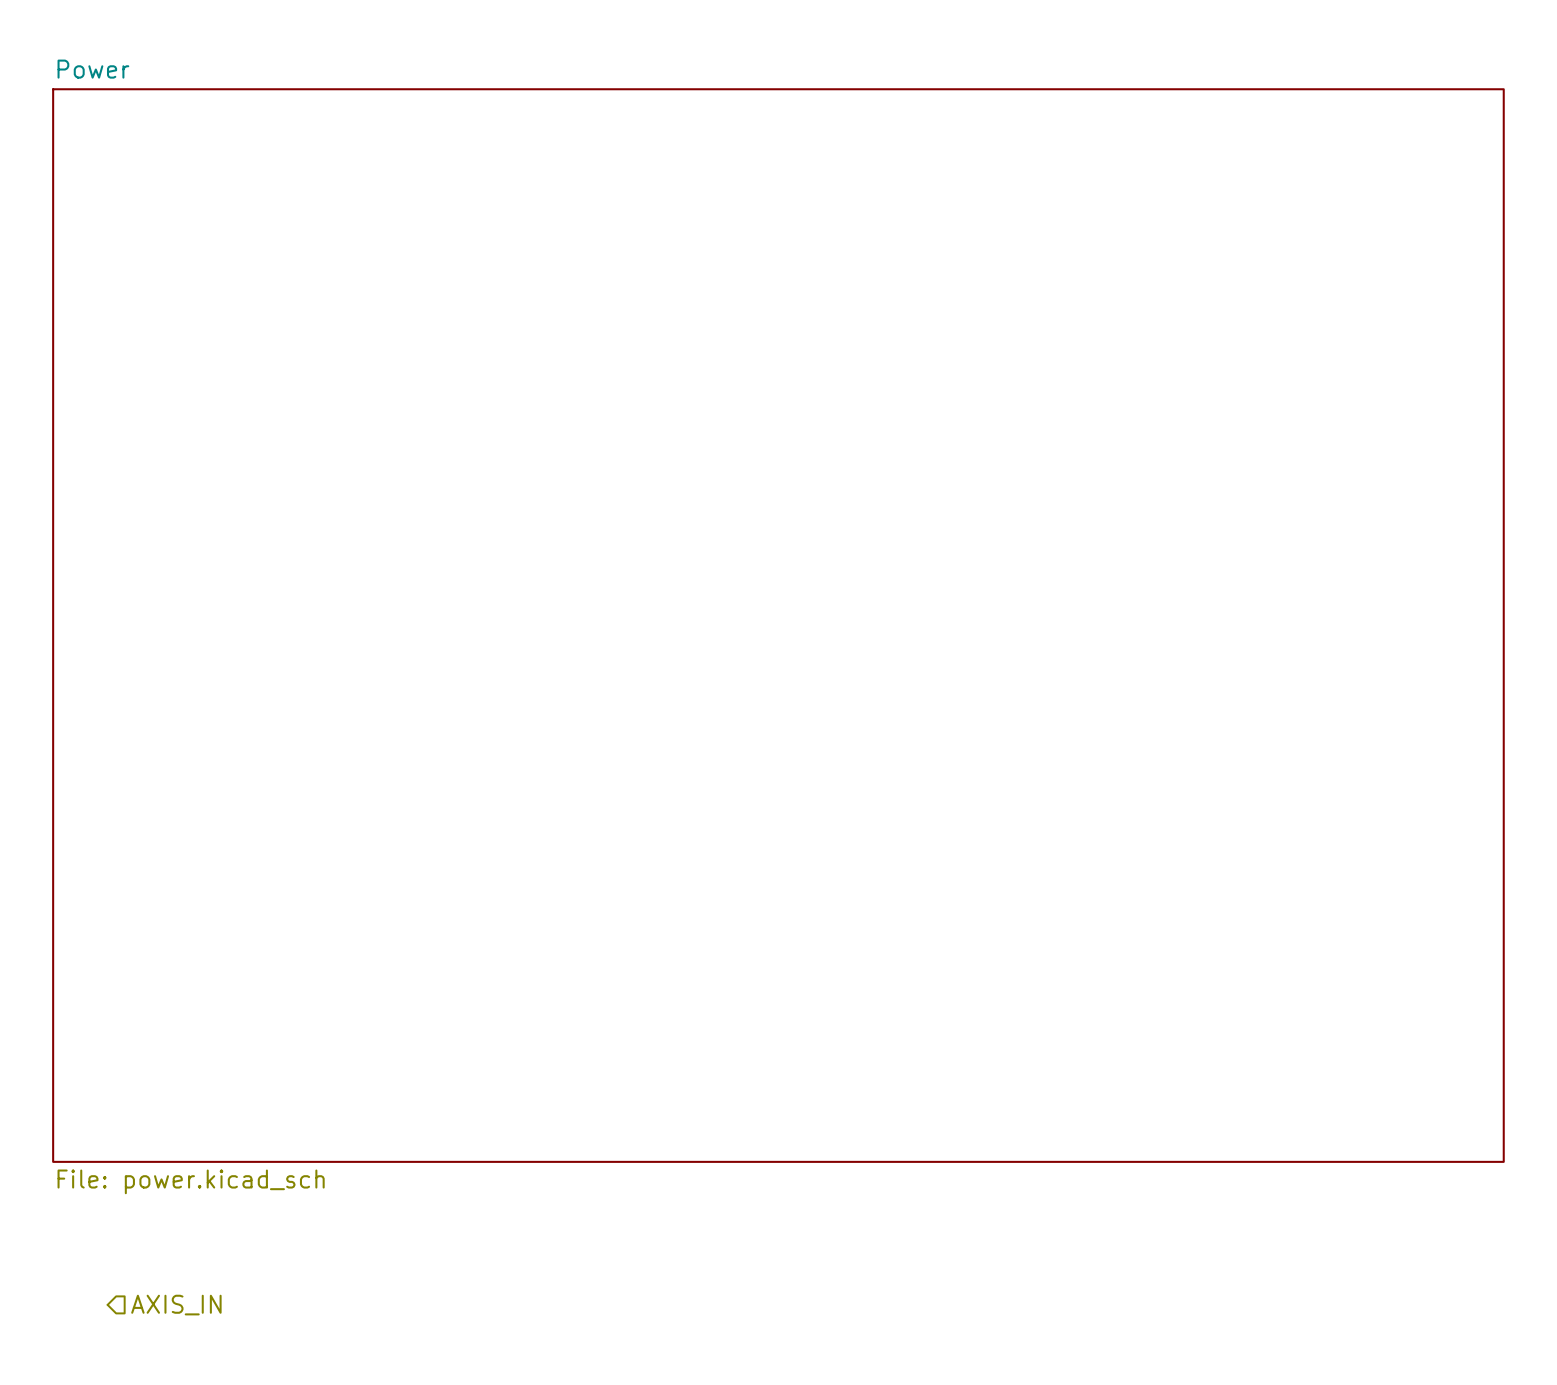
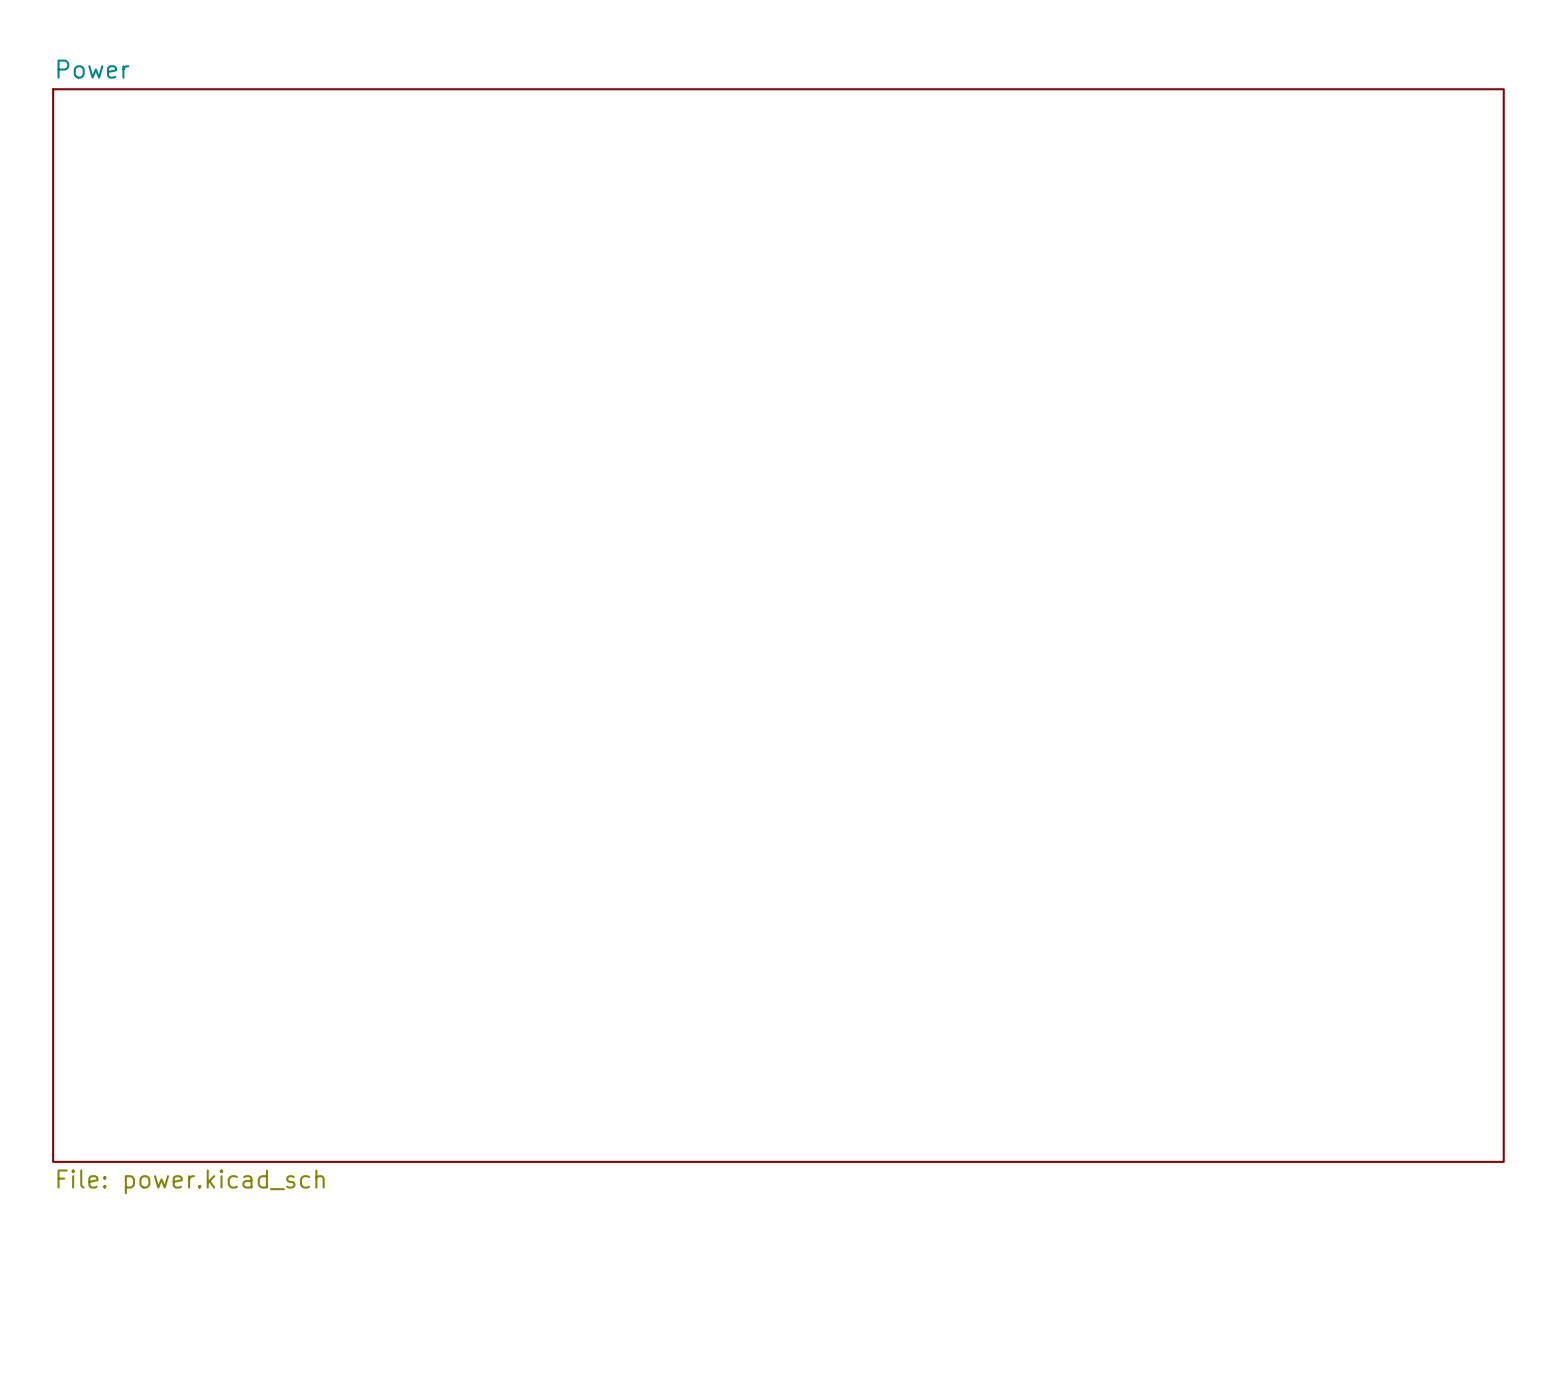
hierarchical label: AXIS_IN (176, 1305) -> none

